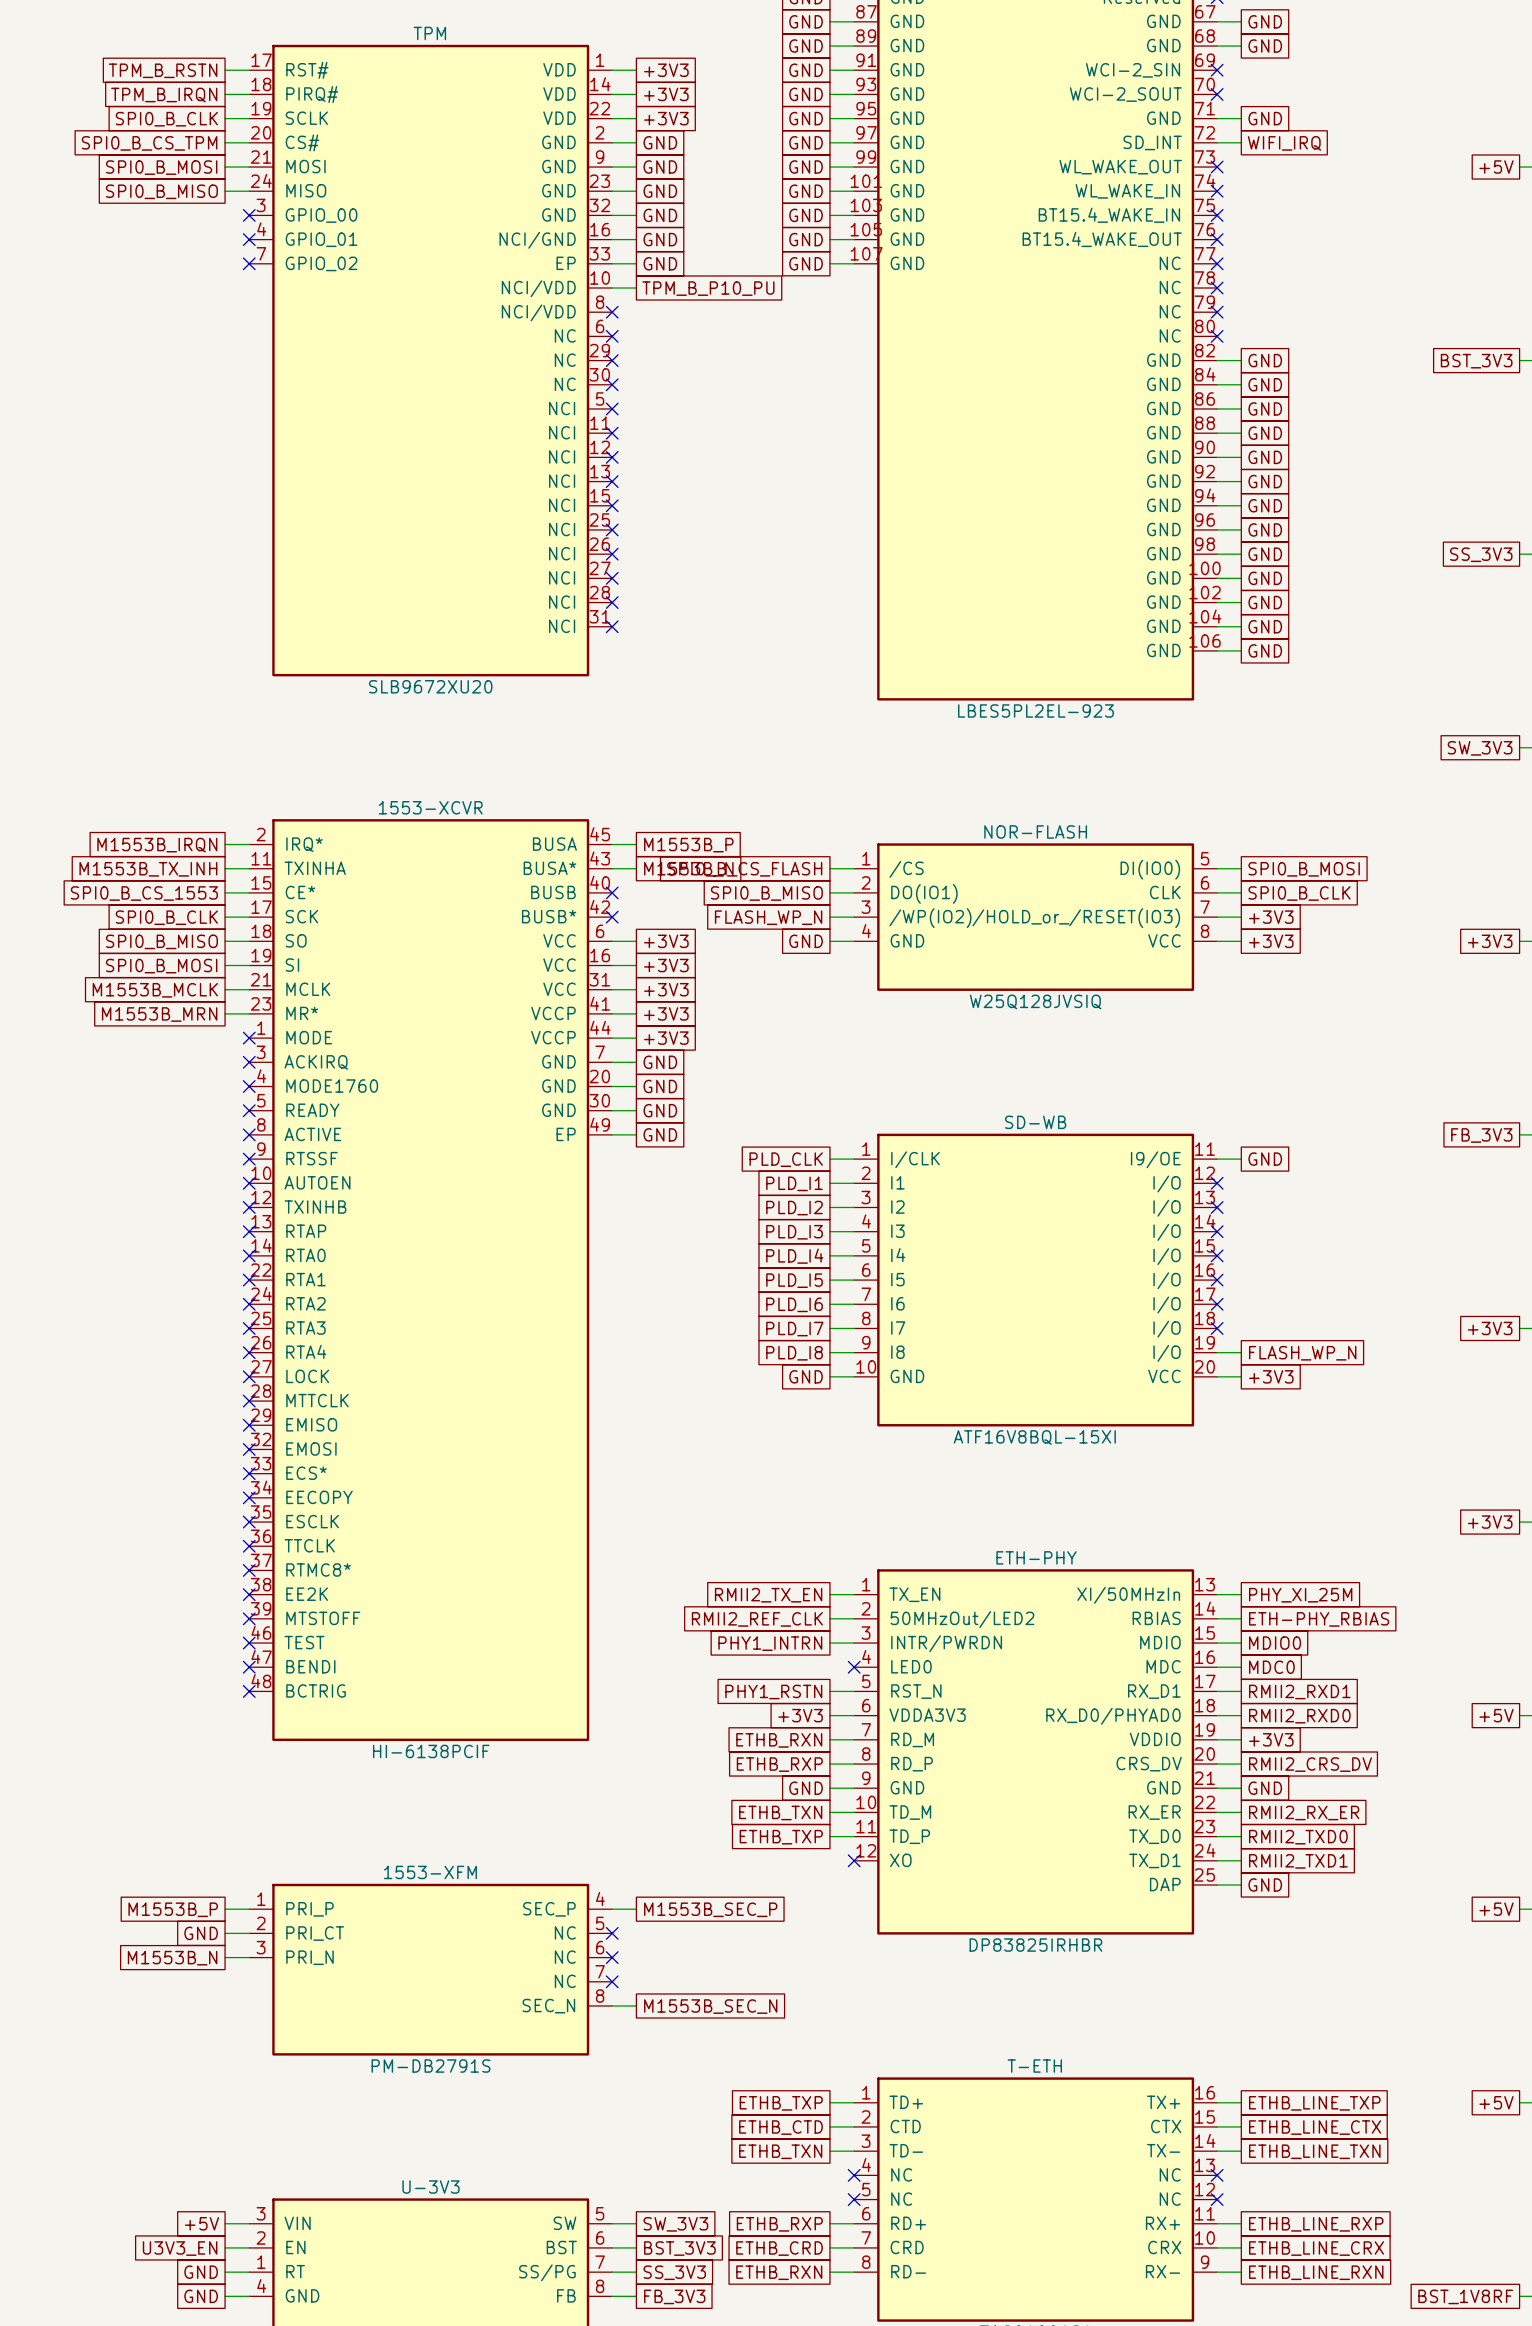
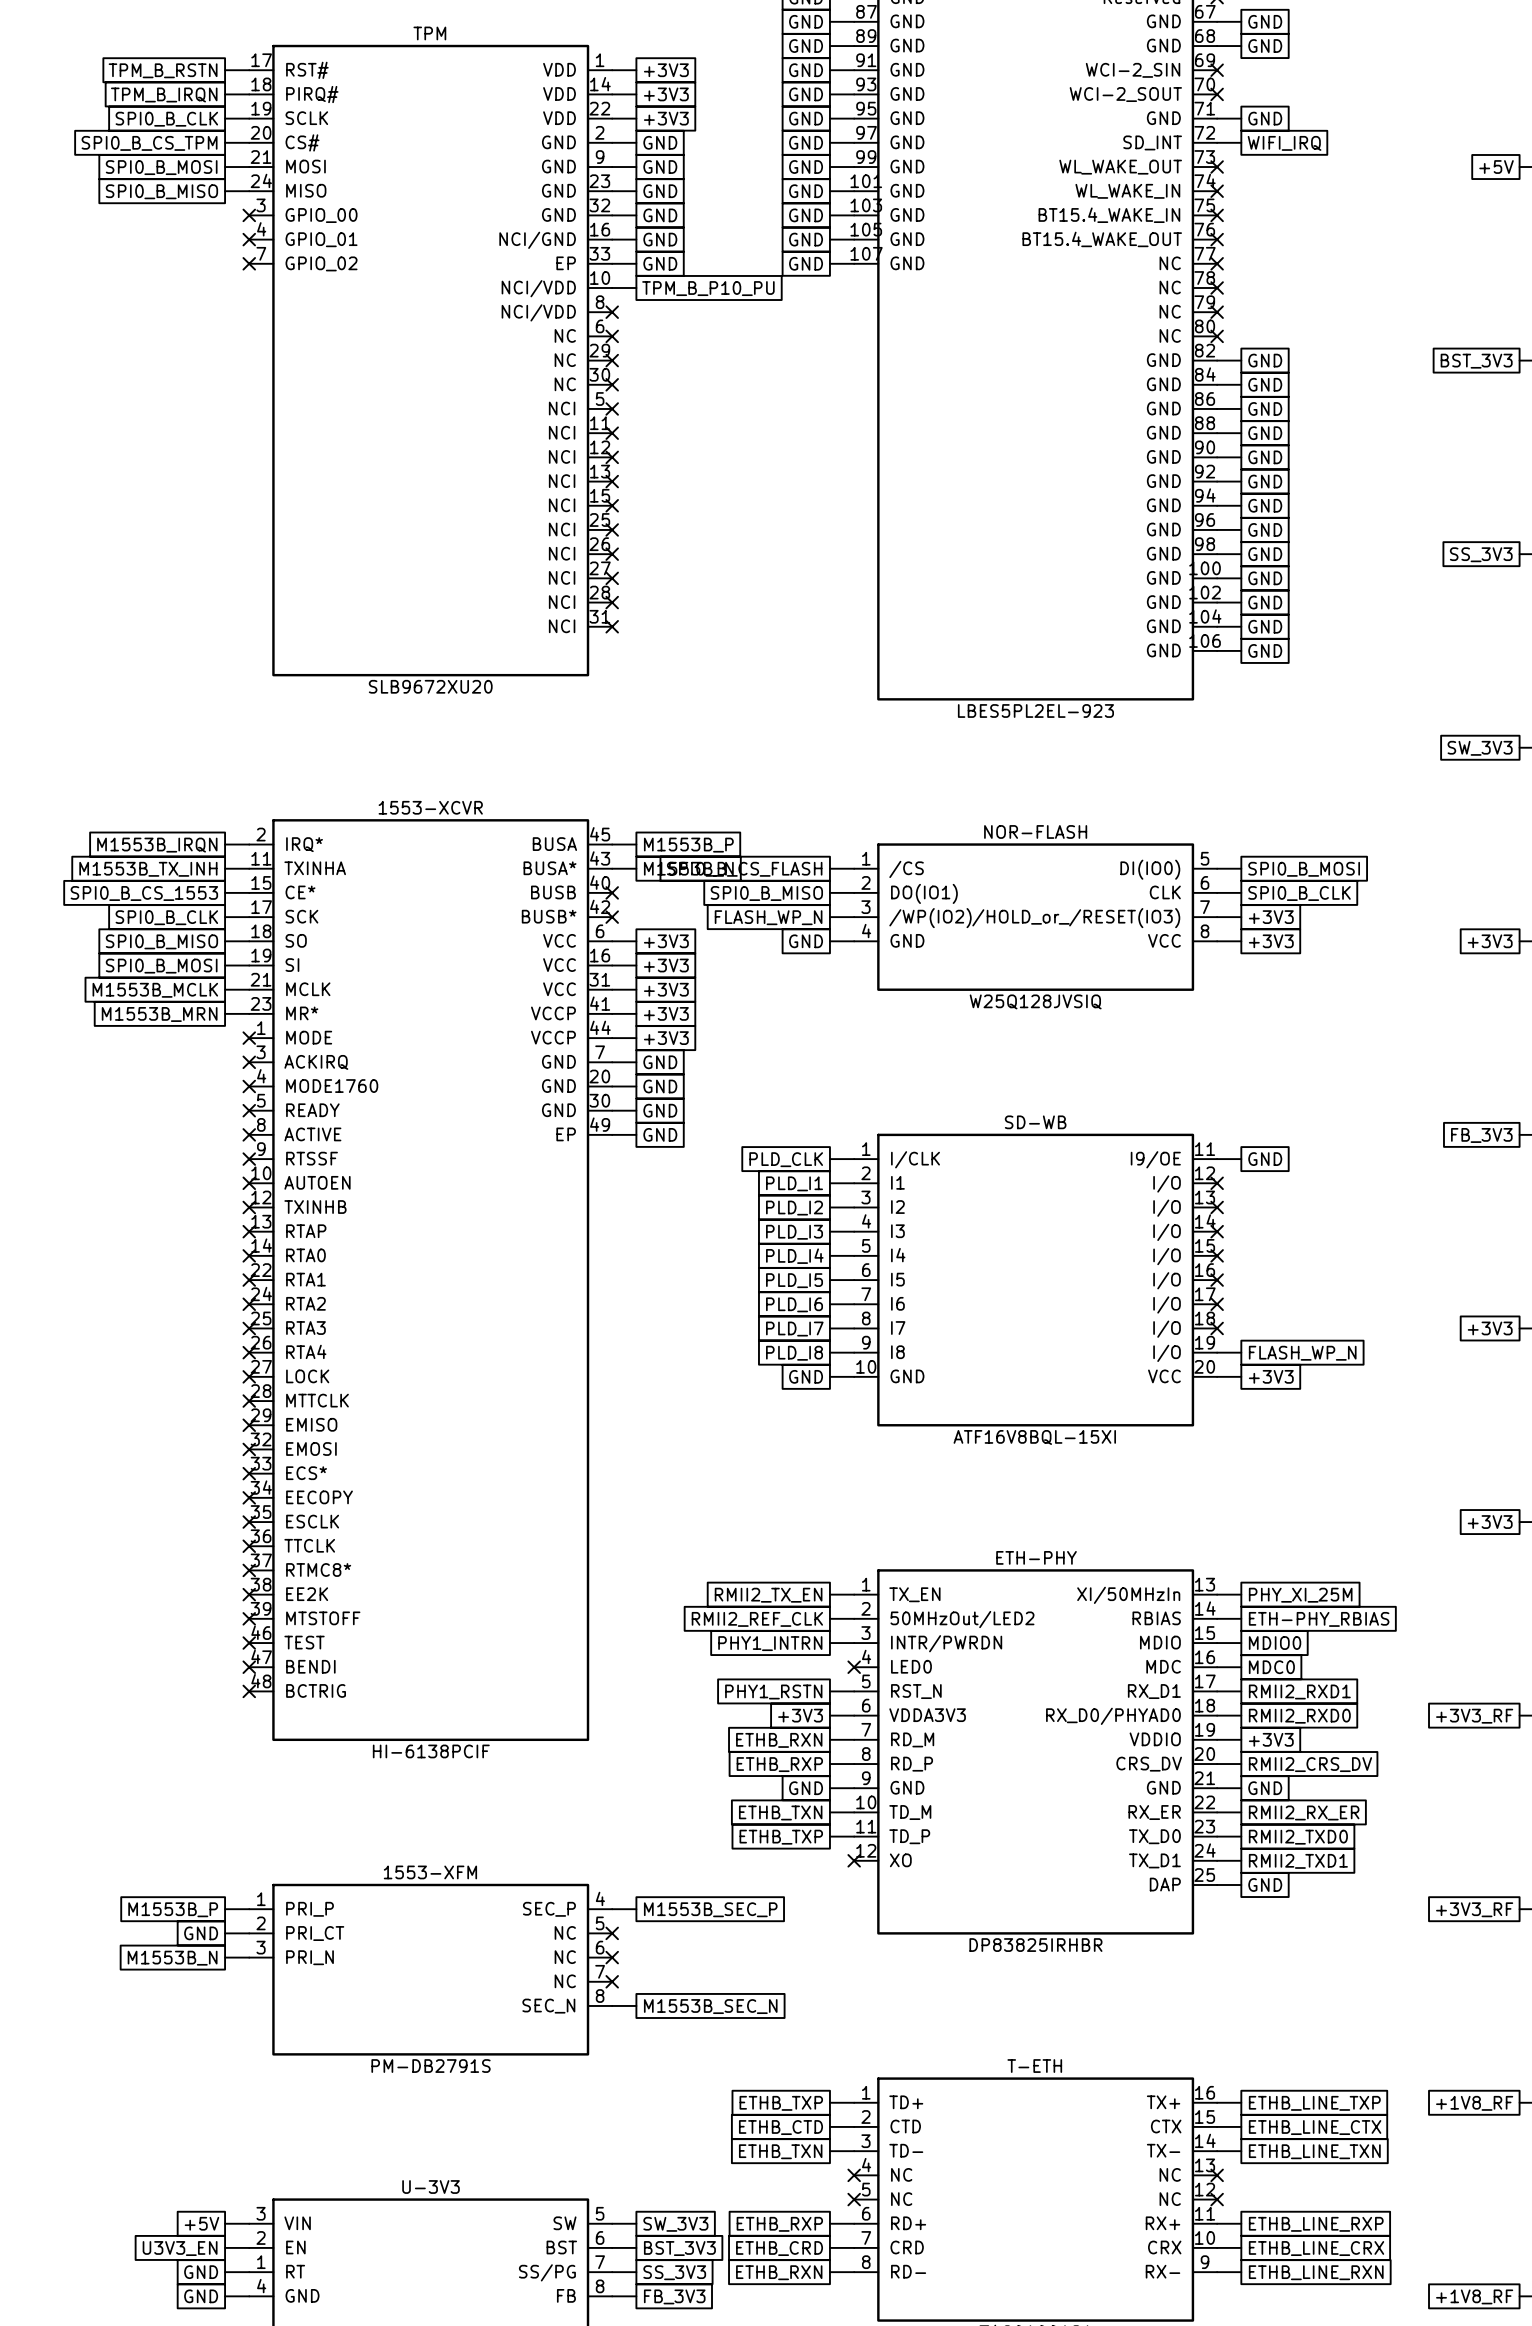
global label: +5V (1496, 1715) -> +3V3_RF (1474, 1716)
global label: +5V (1496, 1909) -> +3V3_RF (1474, 1909)
global label: +5V (1496, 2102) -> +1V8_RF (1474, 2103)
global label: BST_1V8RF (1465, 2296) -> +1V8_RF (1474, 2296)

